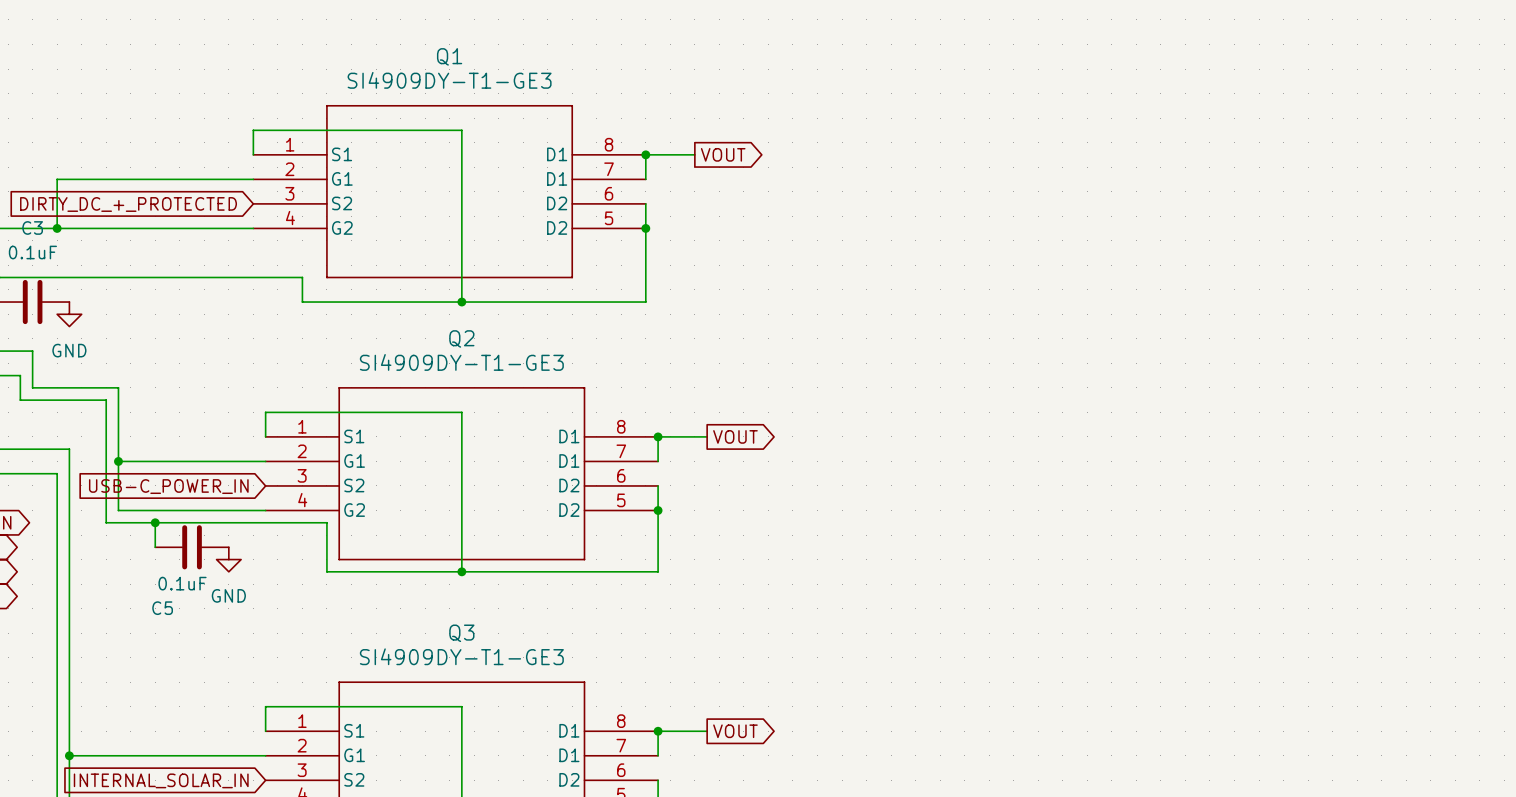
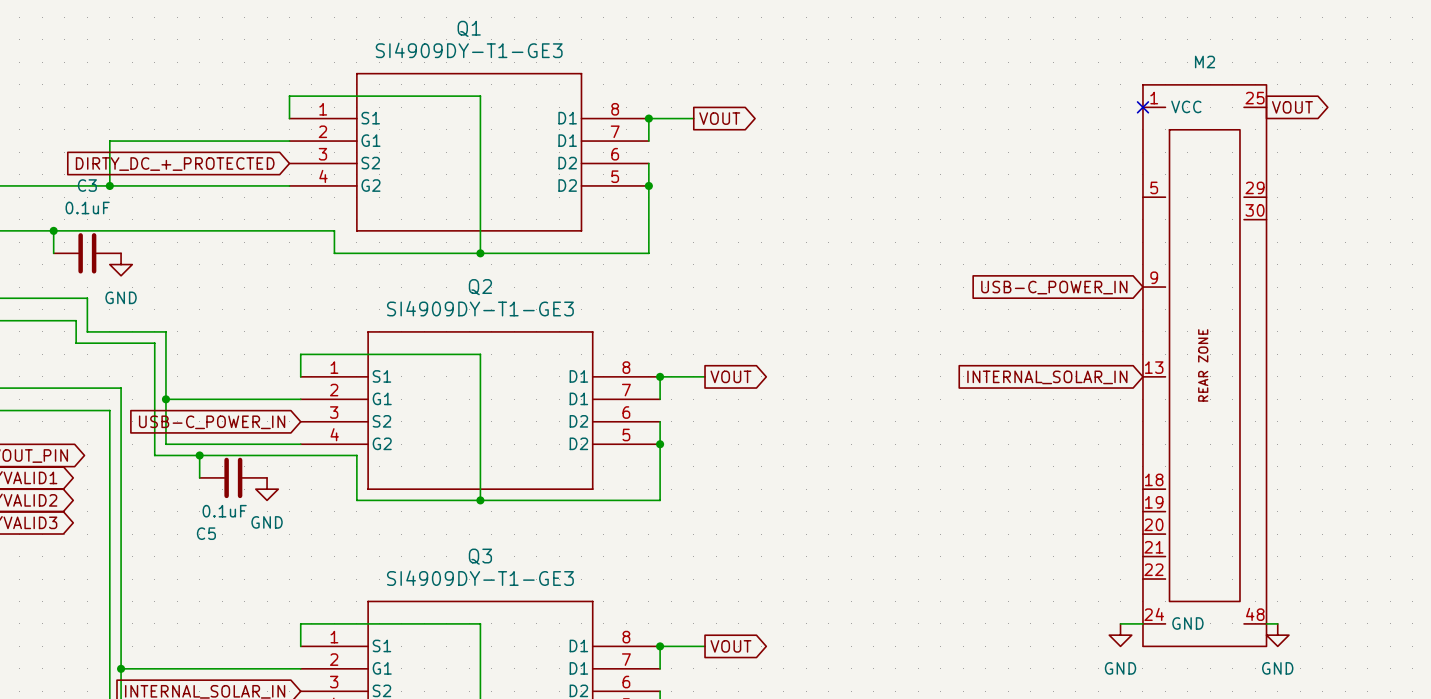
no-connect mark: none -> (1142, 107)
global label: none -> VOUT (1292, 107)
global label: none -> USB-C_POWER_IN (1054, 287)
M2: none -> (1204, 365)
global label: none -> INTERNAL_SOLAR_IN (1047, 377)
wire: none -> (1120, 623) (1142, 623)
wire: none -> (1266, 623) (1277, 623)
power symbol: none -> GND (1120, 635)
power symbol: none -> GND (1277, 635)

